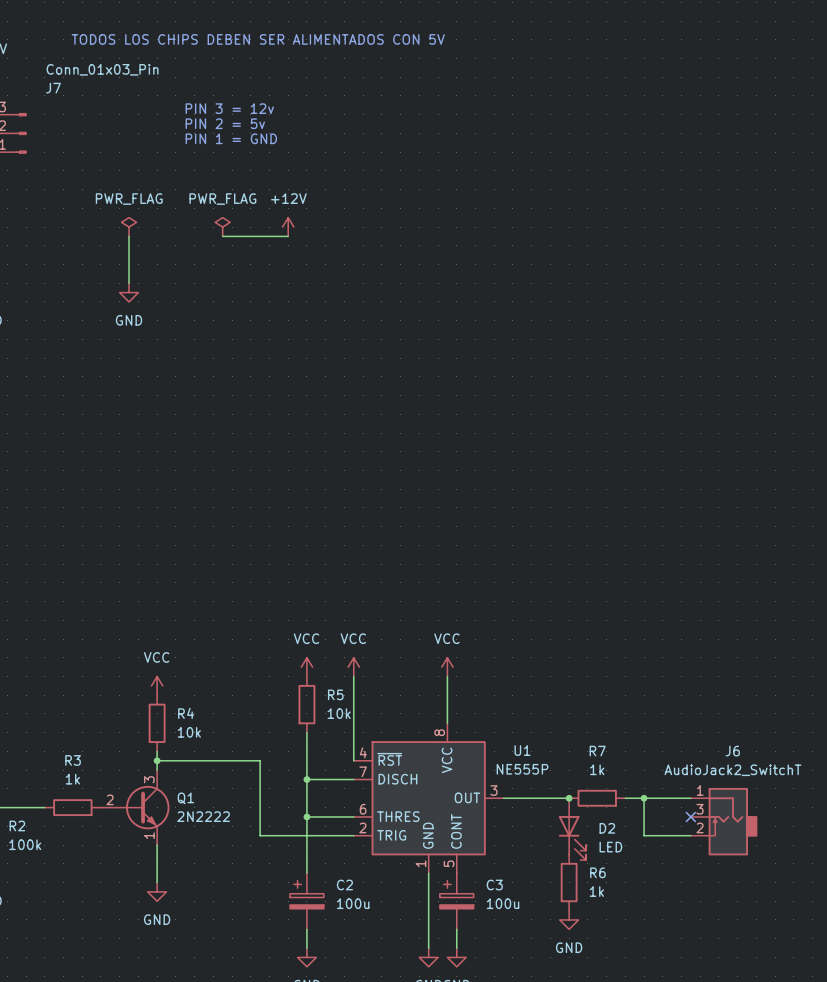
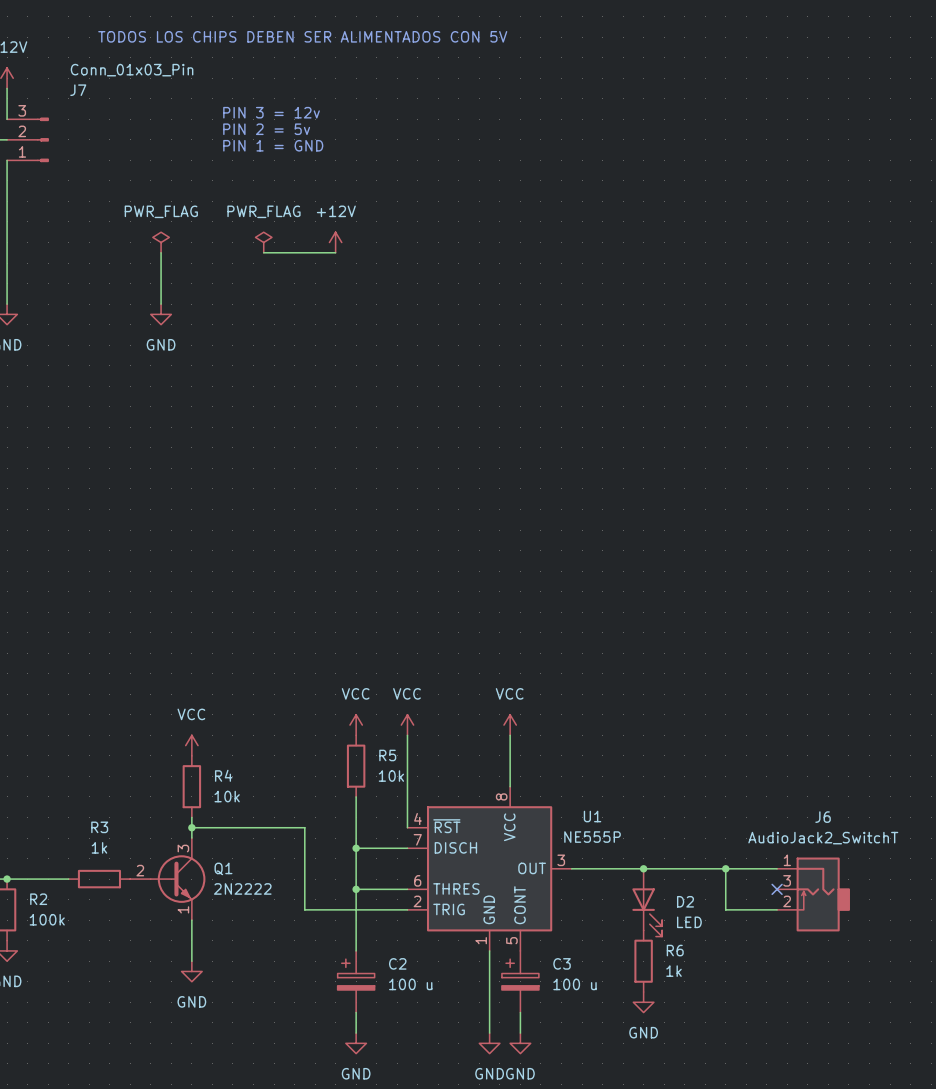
wire: none -> (643, 868) (705, 868)
R7: 1k (597, 798) -> none
C2 value: 100u (353, 903) -> 100 u (410, 984)
C3 value: 100u (502, 903) -> 100 u (575, 984)

